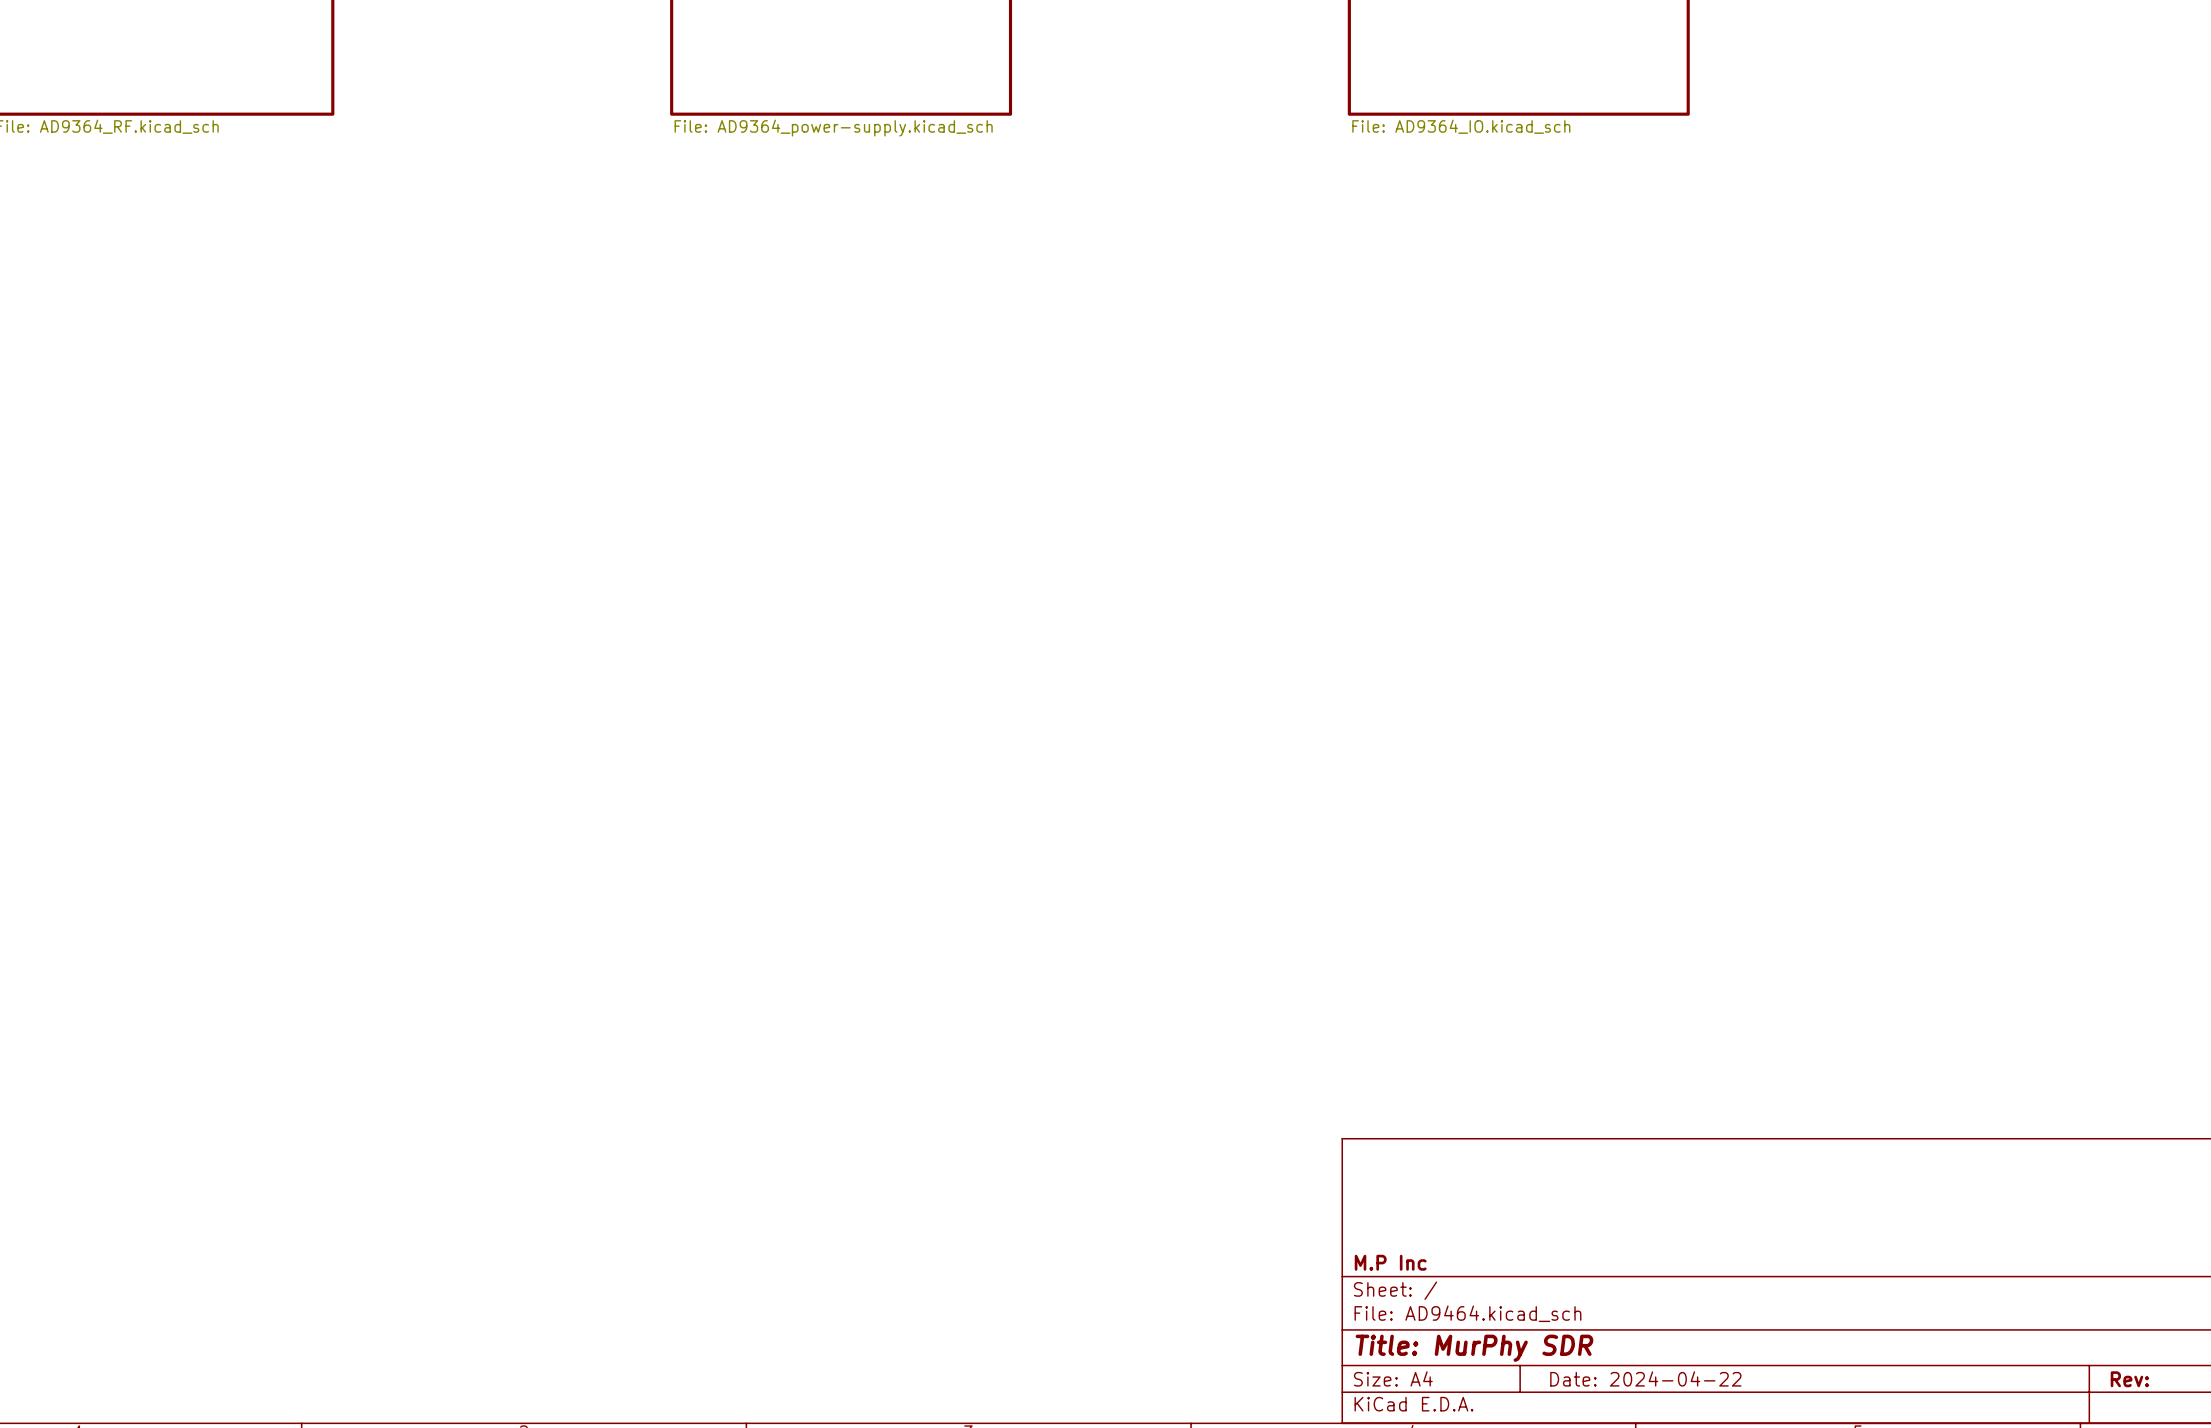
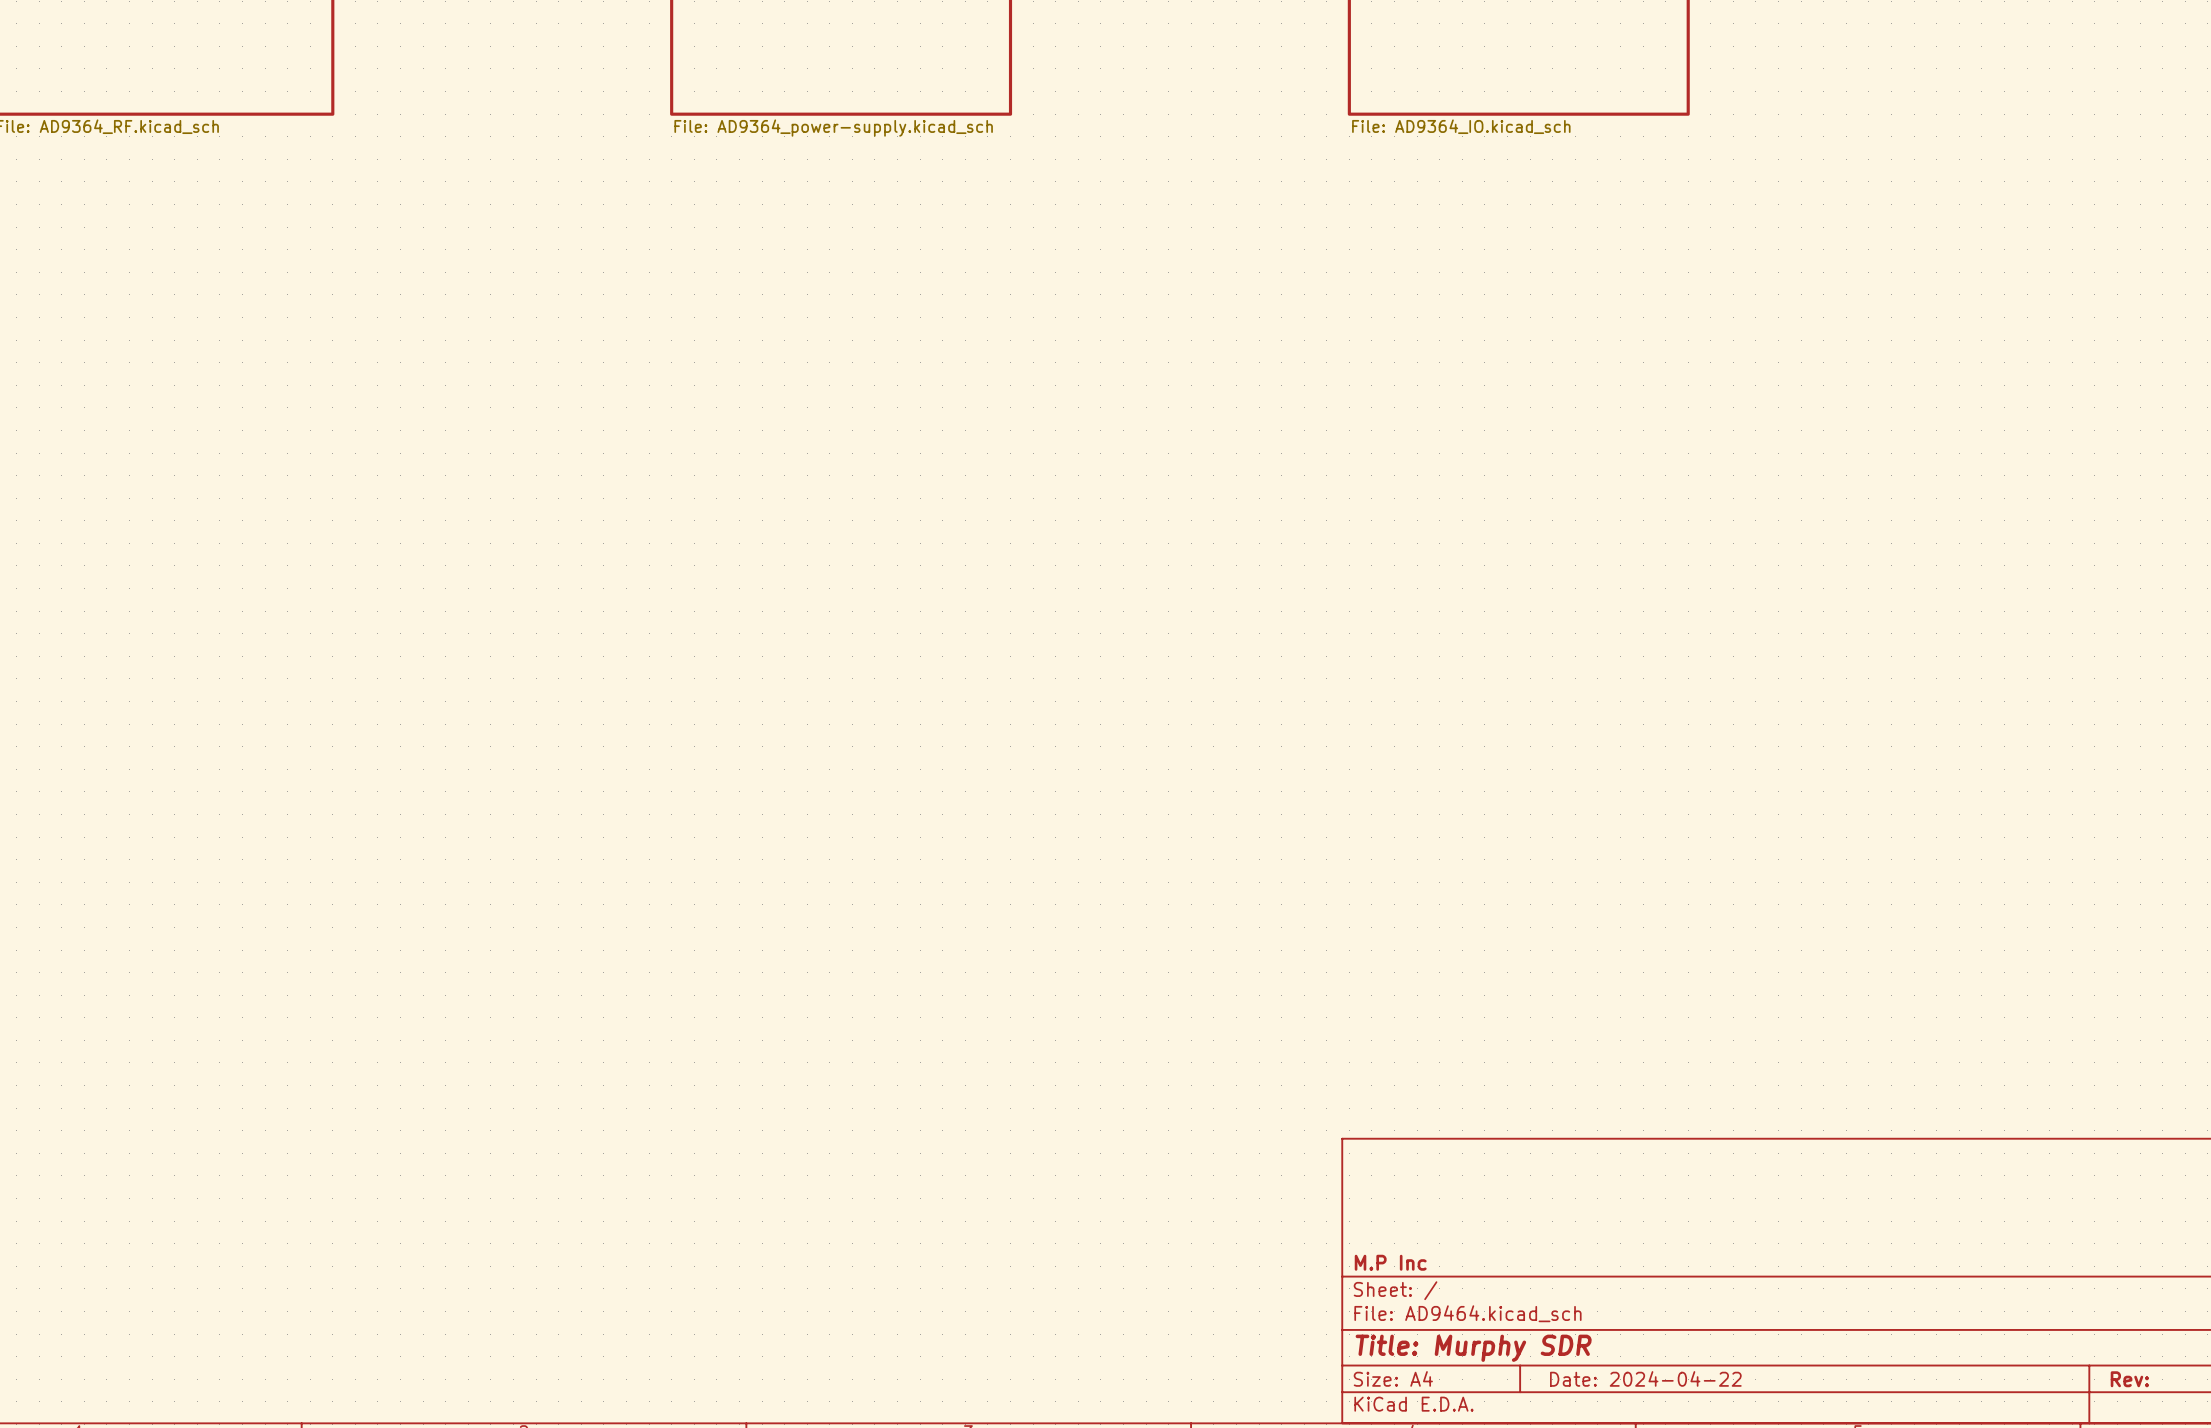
title block: Title: MurPhy SDR (1474, 1348) -> Title: Murphy SDR (1473, 1348)

